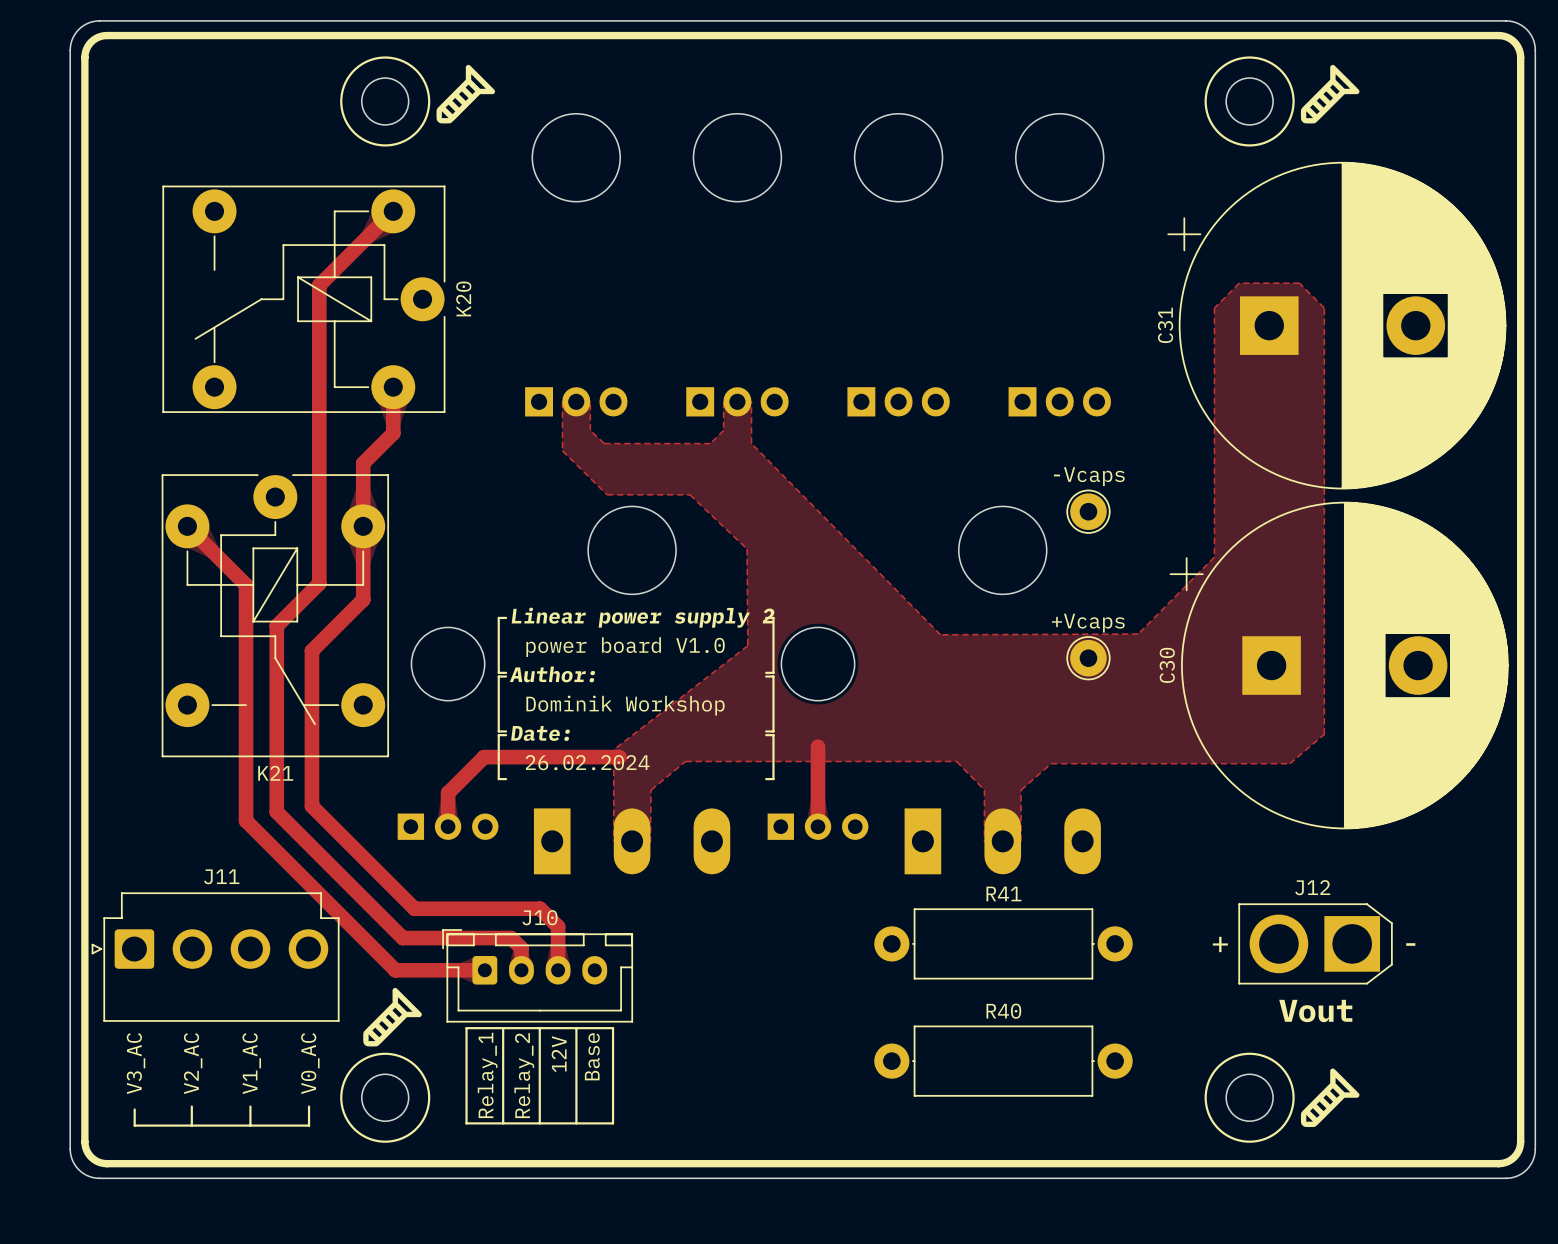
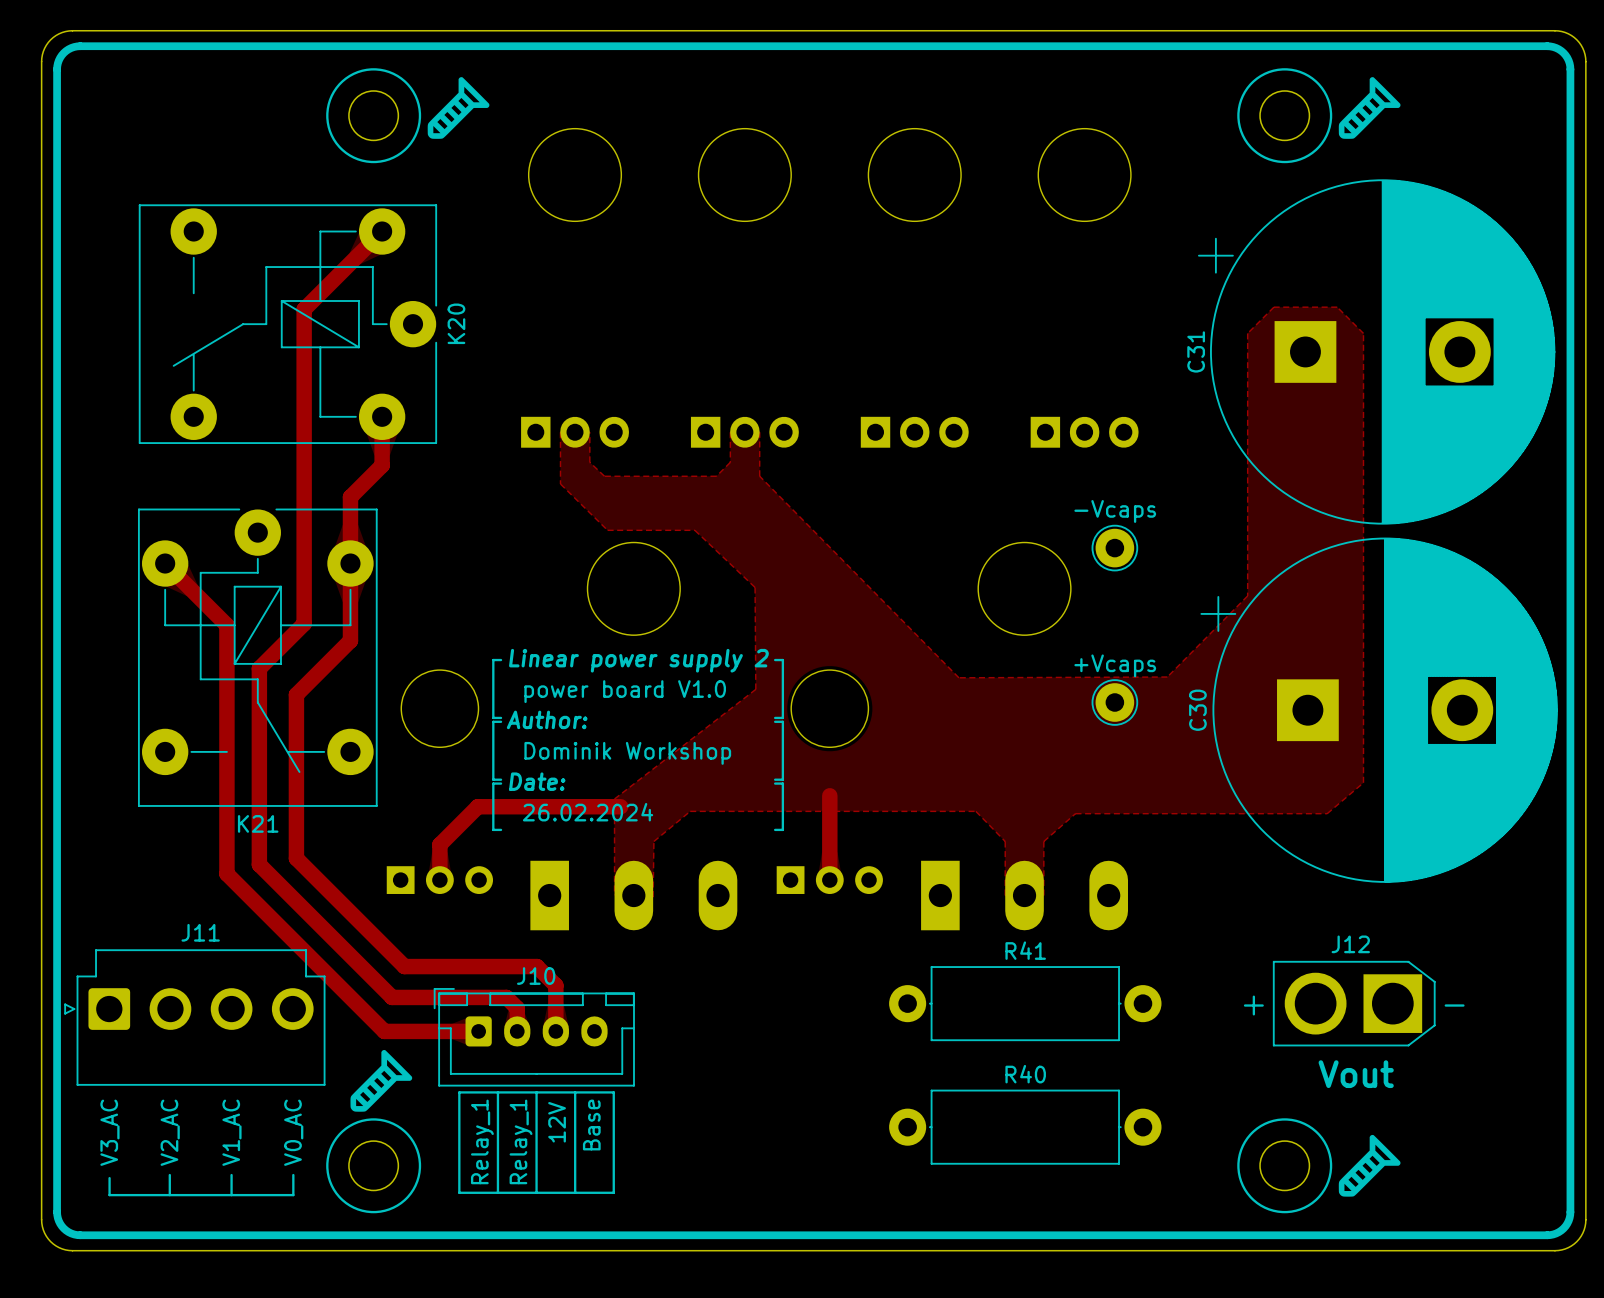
text: Relay_2 (524, 1075) -> Relay_1 (521, 1141)

